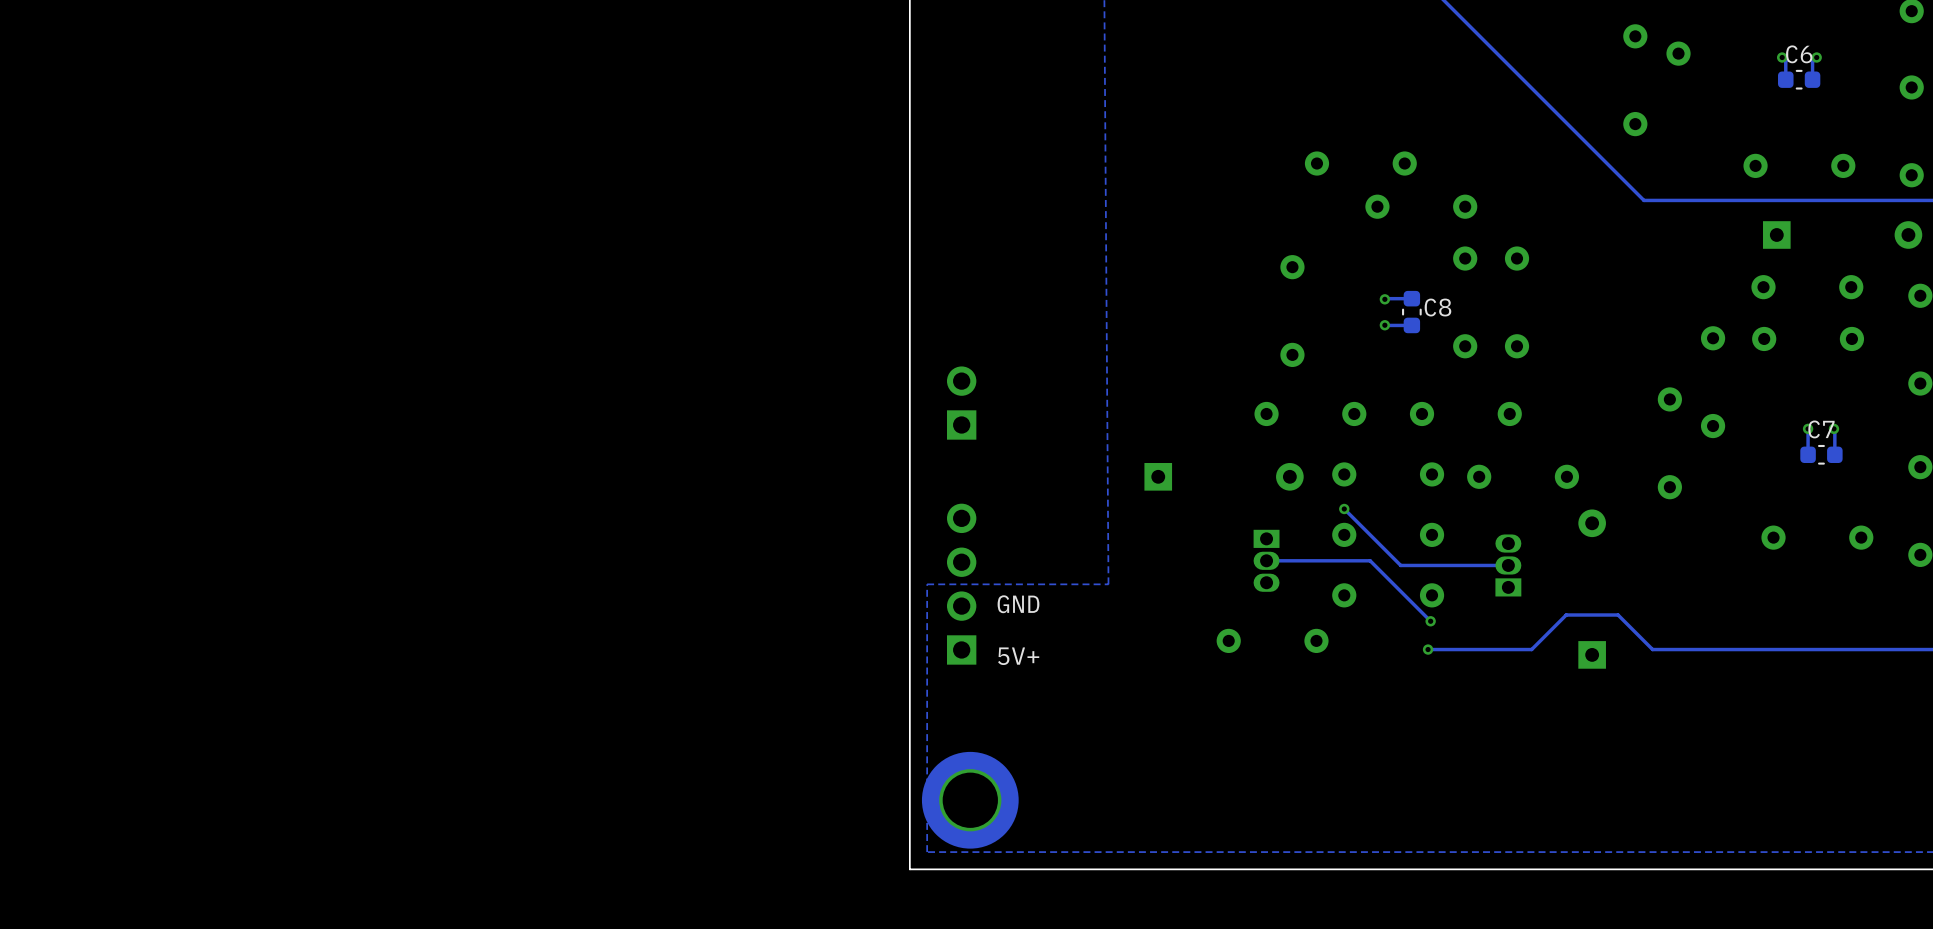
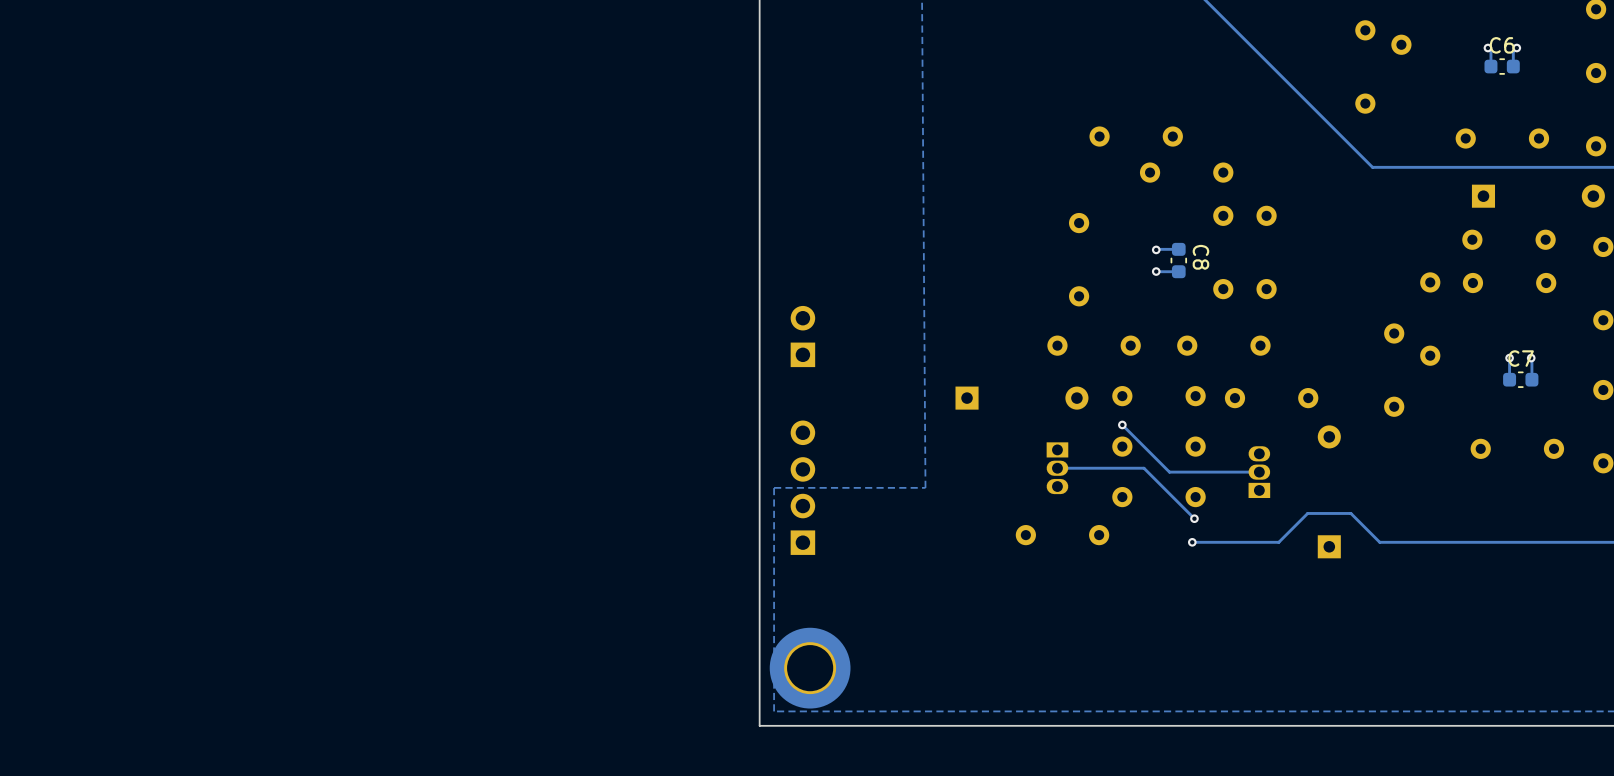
C8 name rotation: 0° (1437, 307) -> 90° clockwise (1200, 257)
text: GND (1018, 604) -> none
text: 5V+ (1018, 656) -> none

